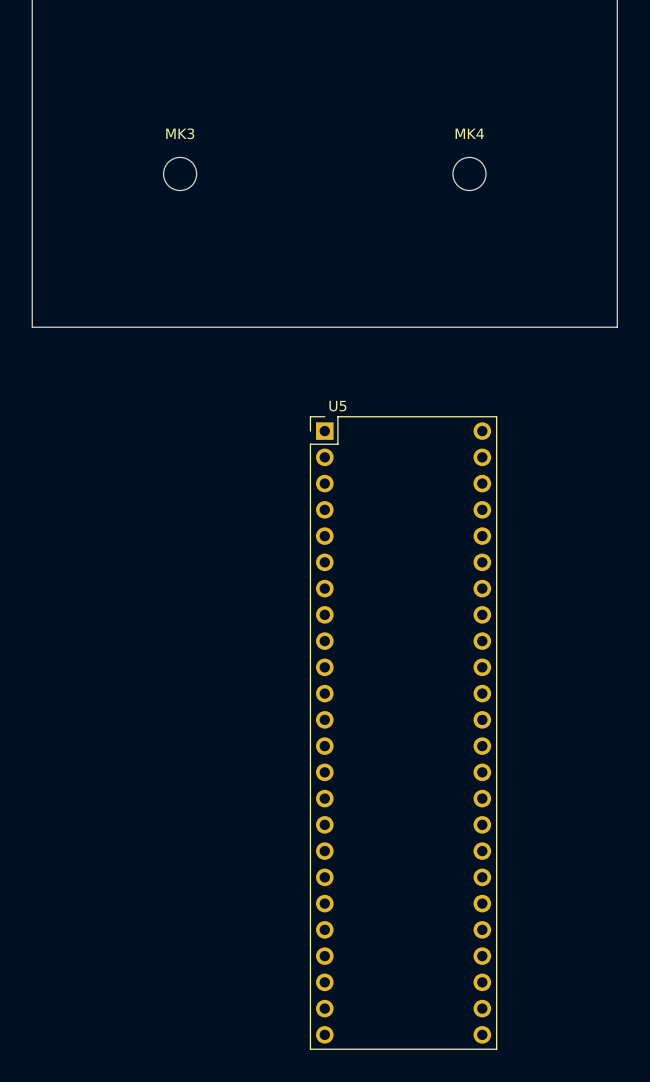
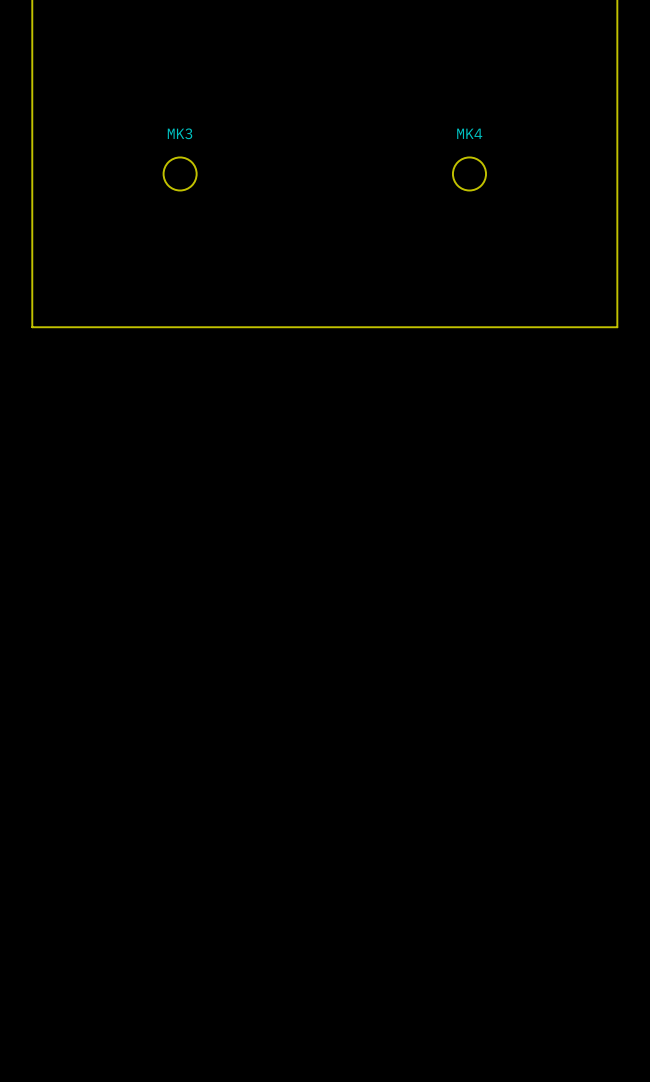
U5: (403, 732) -> none

